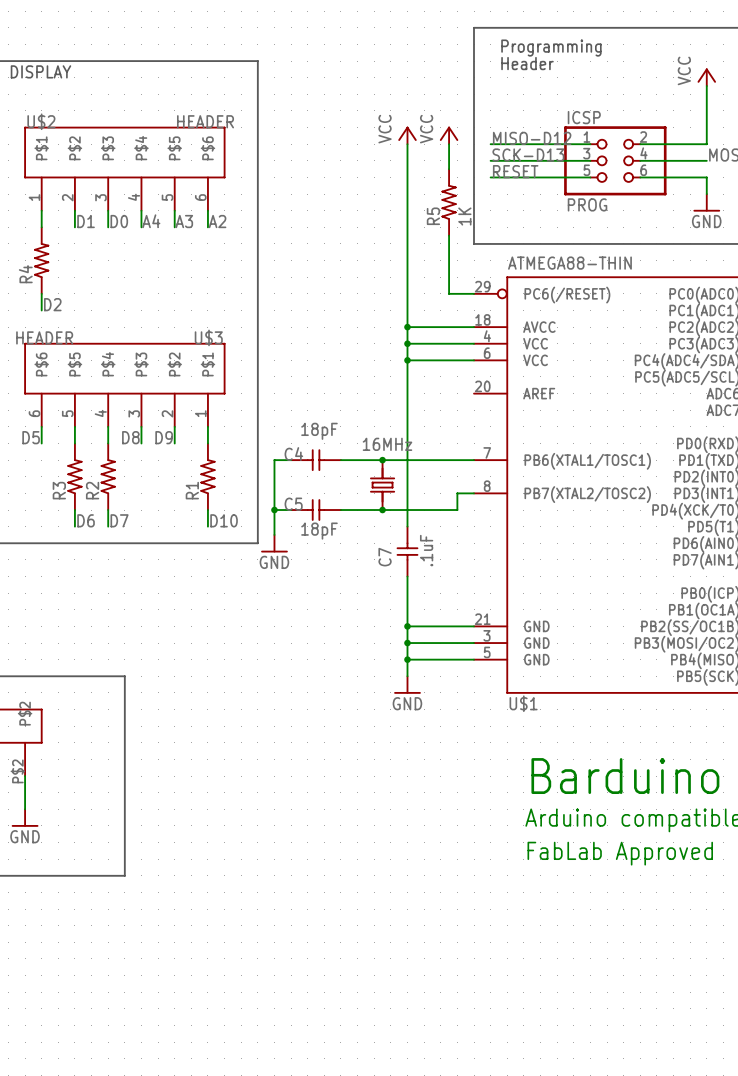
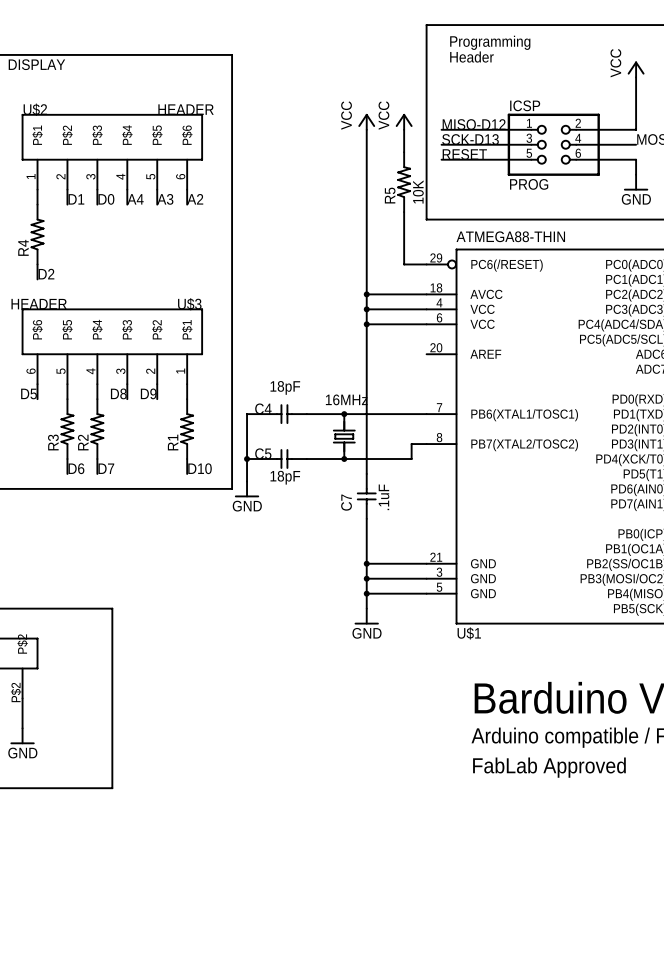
R5 value: 1K (464, 216) -> 10K (418, 191)

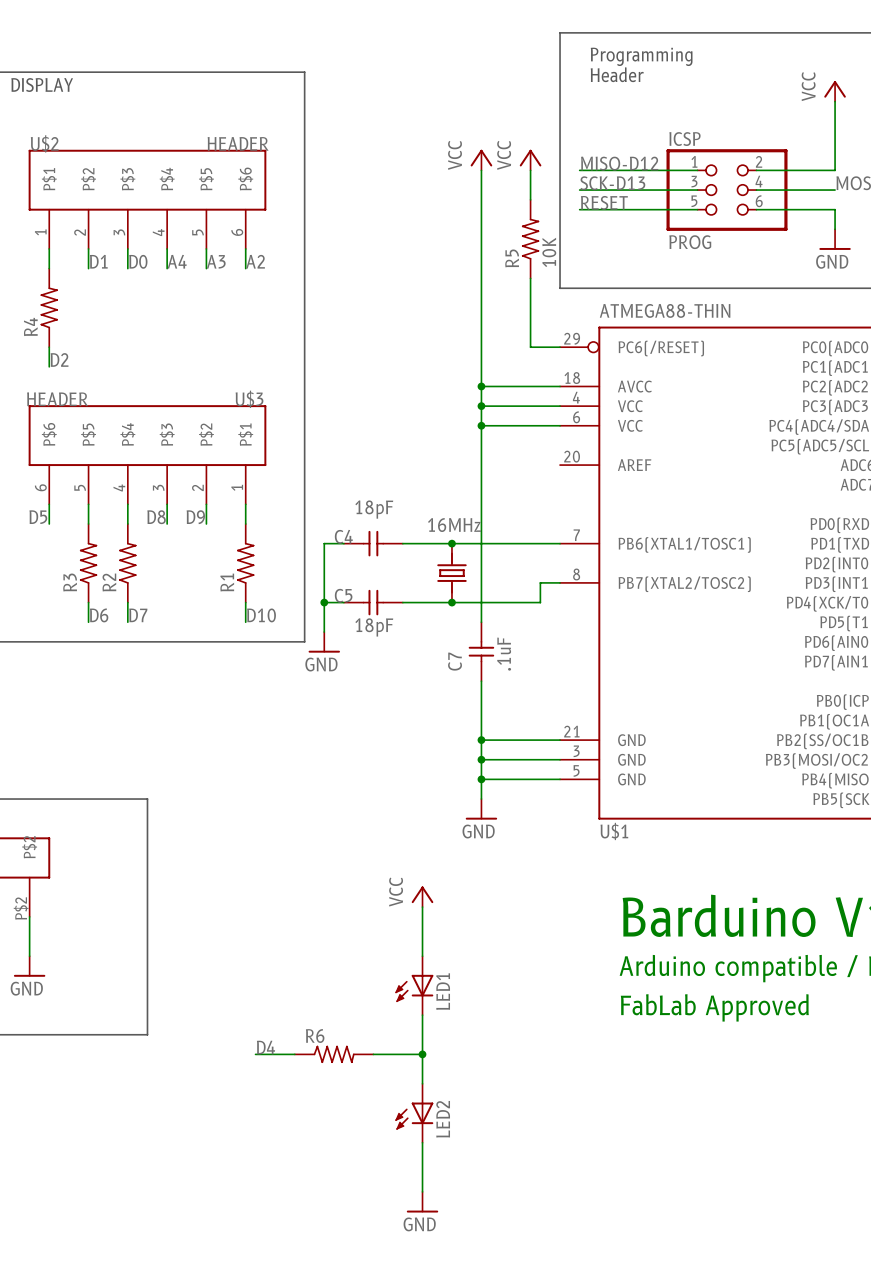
power symbol: none -> VCC (422, 896)
wire: none -> (422, 907) (422, 956)
LED1: none -> (414, 985)
wire: none -> (422, 1015) (422, 1083)
text: none -> D4 (265, 1047)
wire: none -> (255, 1054) (294, 1054)
R6: none -> (334, 1054)
wire: none -> (373, 1054) (422, 1054)
junction: none -> (422, 1054)
LED2: none -> (414, 1113)
wire: none -> (422, 1142) (422, 1191)
power symbol: none -> GND (422, 1202)

